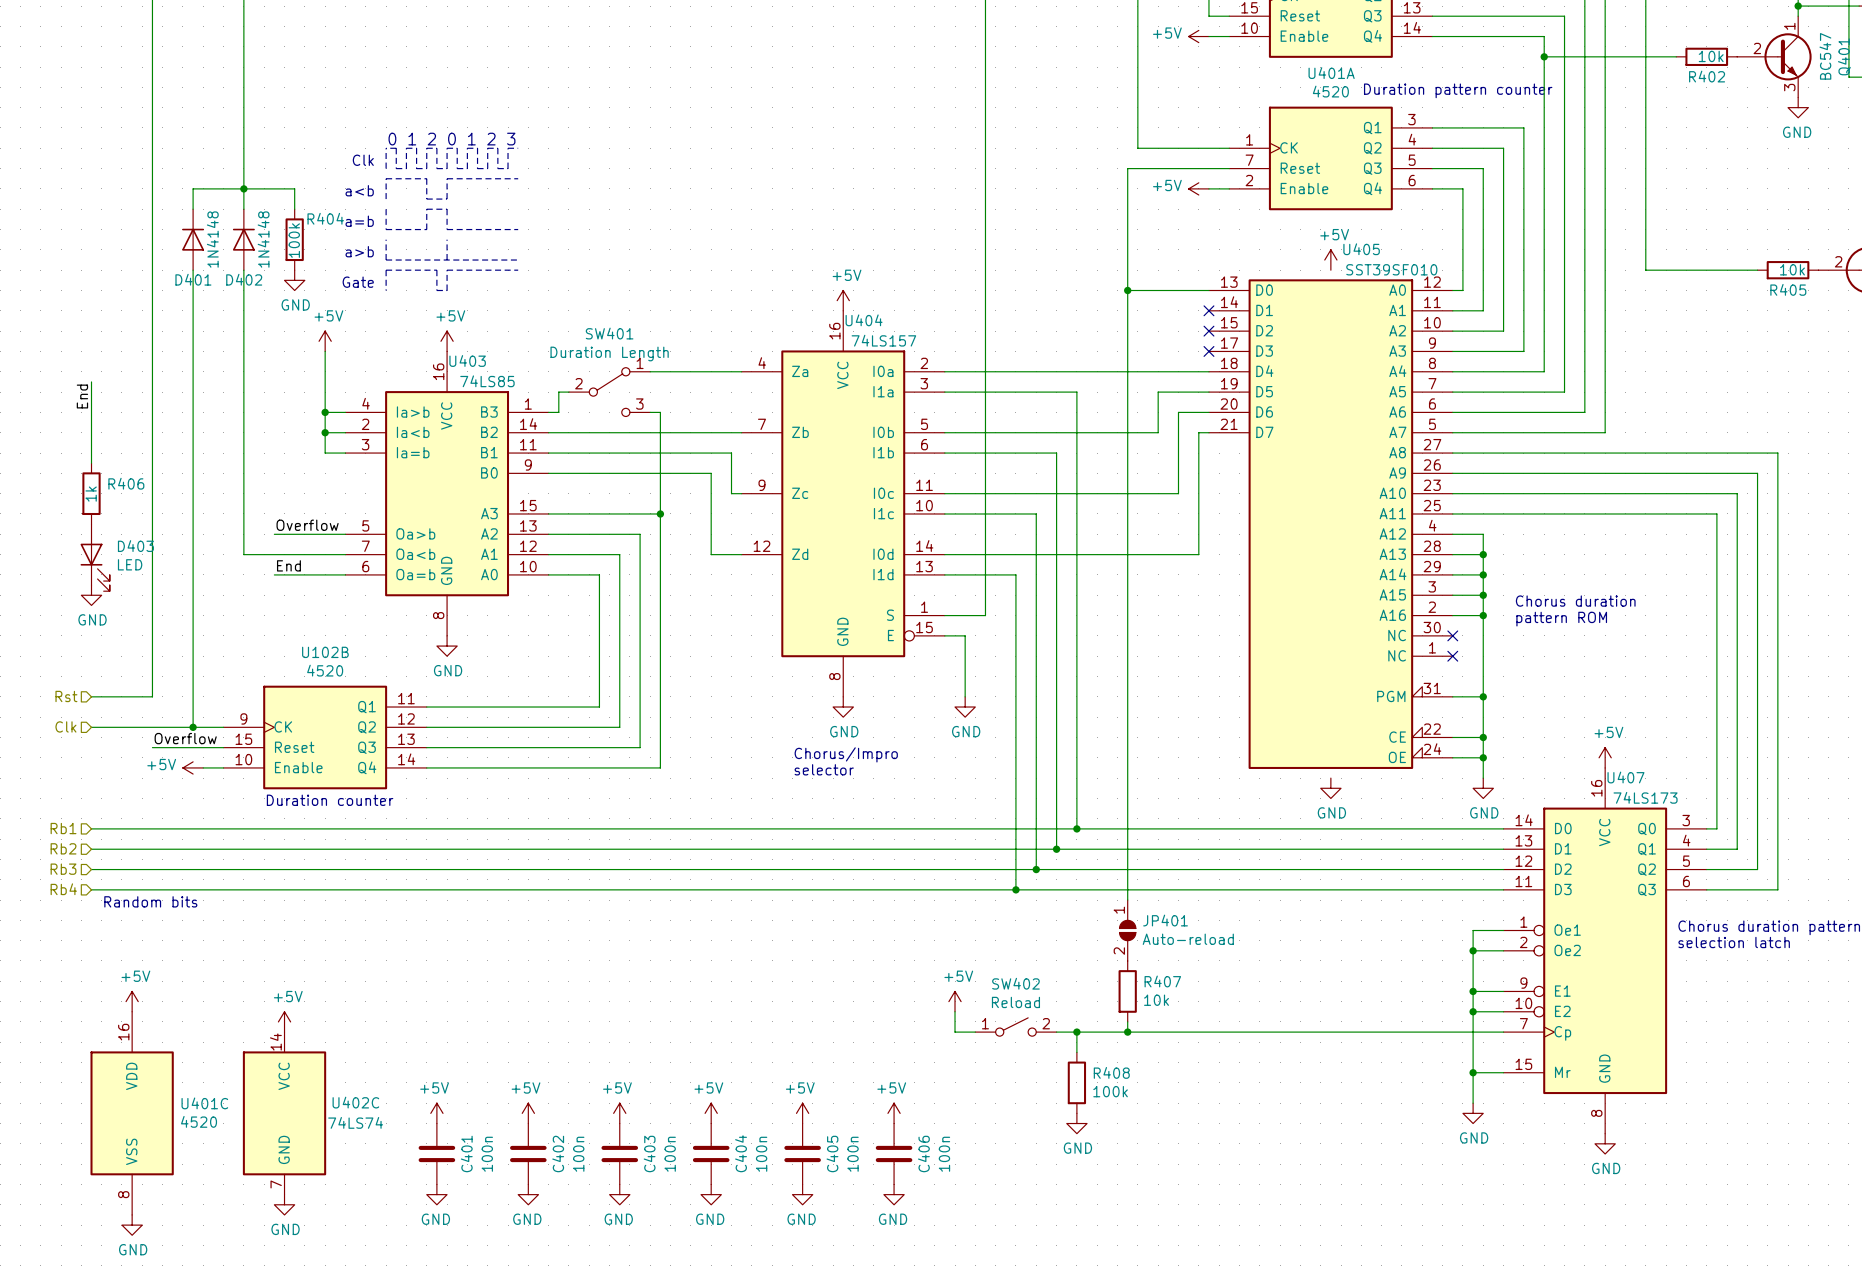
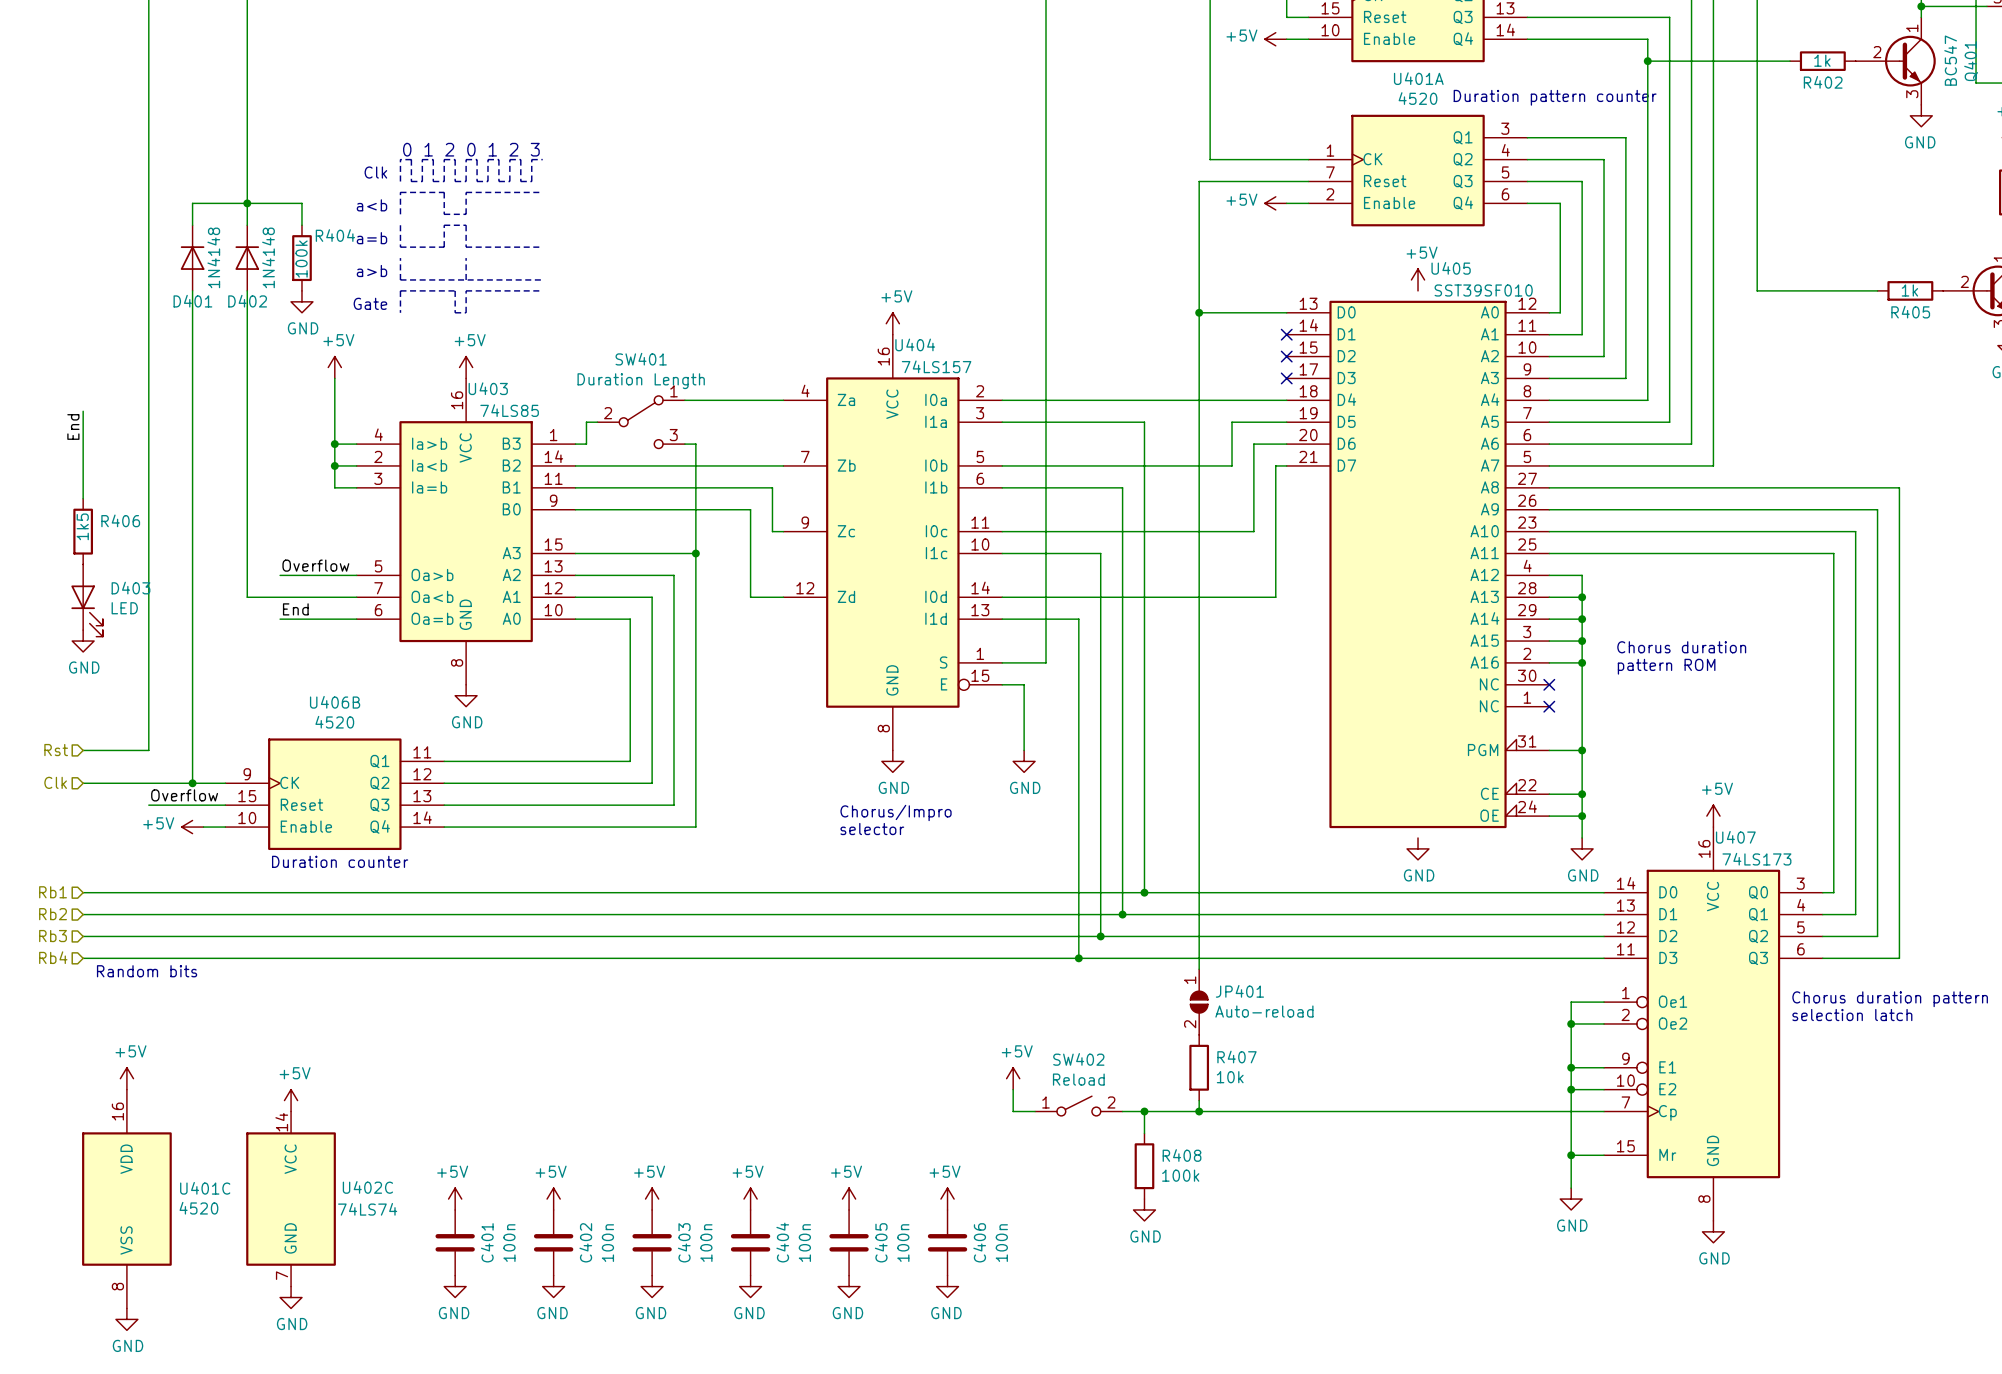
R402 value: 10k (1711, 56) -> 1k (1822, 60)
R405 value: 10k (1792, 269) -> 1k (1909, 290)
R406 value: 1k (91, 494) -> 1k5 (82, 526)
U102B name: U102B (325, 652) -> U406B (335, 702)

